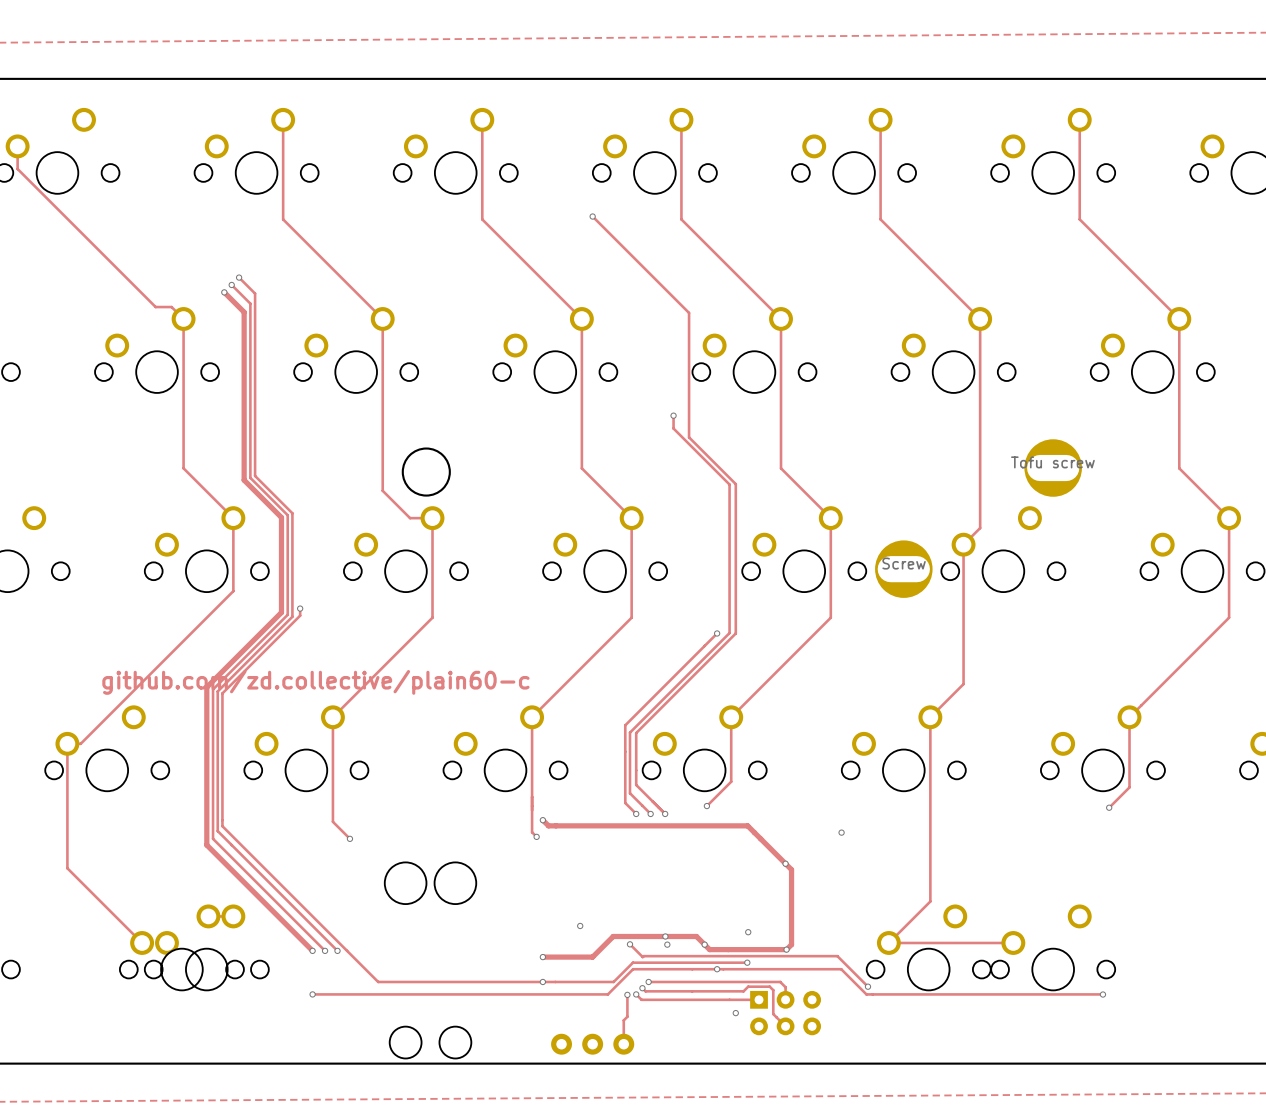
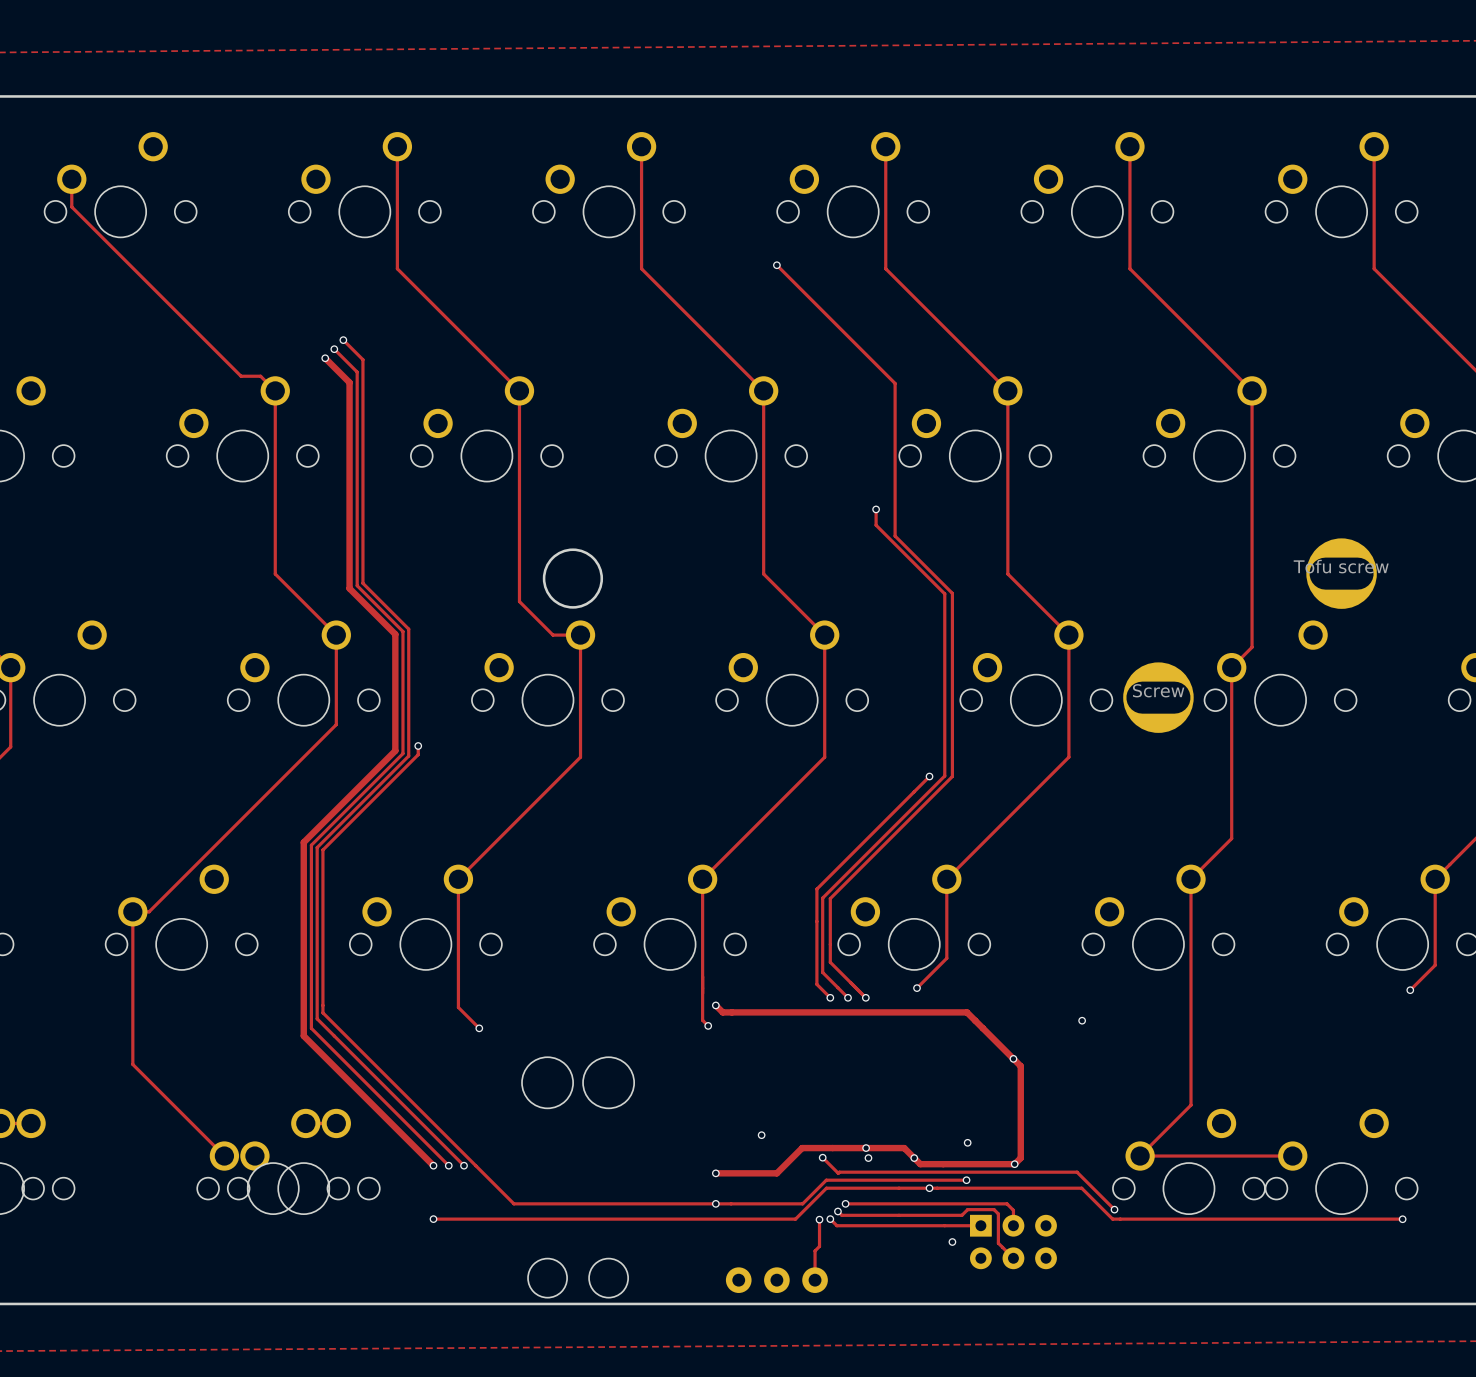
text: github.com/zd.collective/plain60-c (315, 682) -> none

